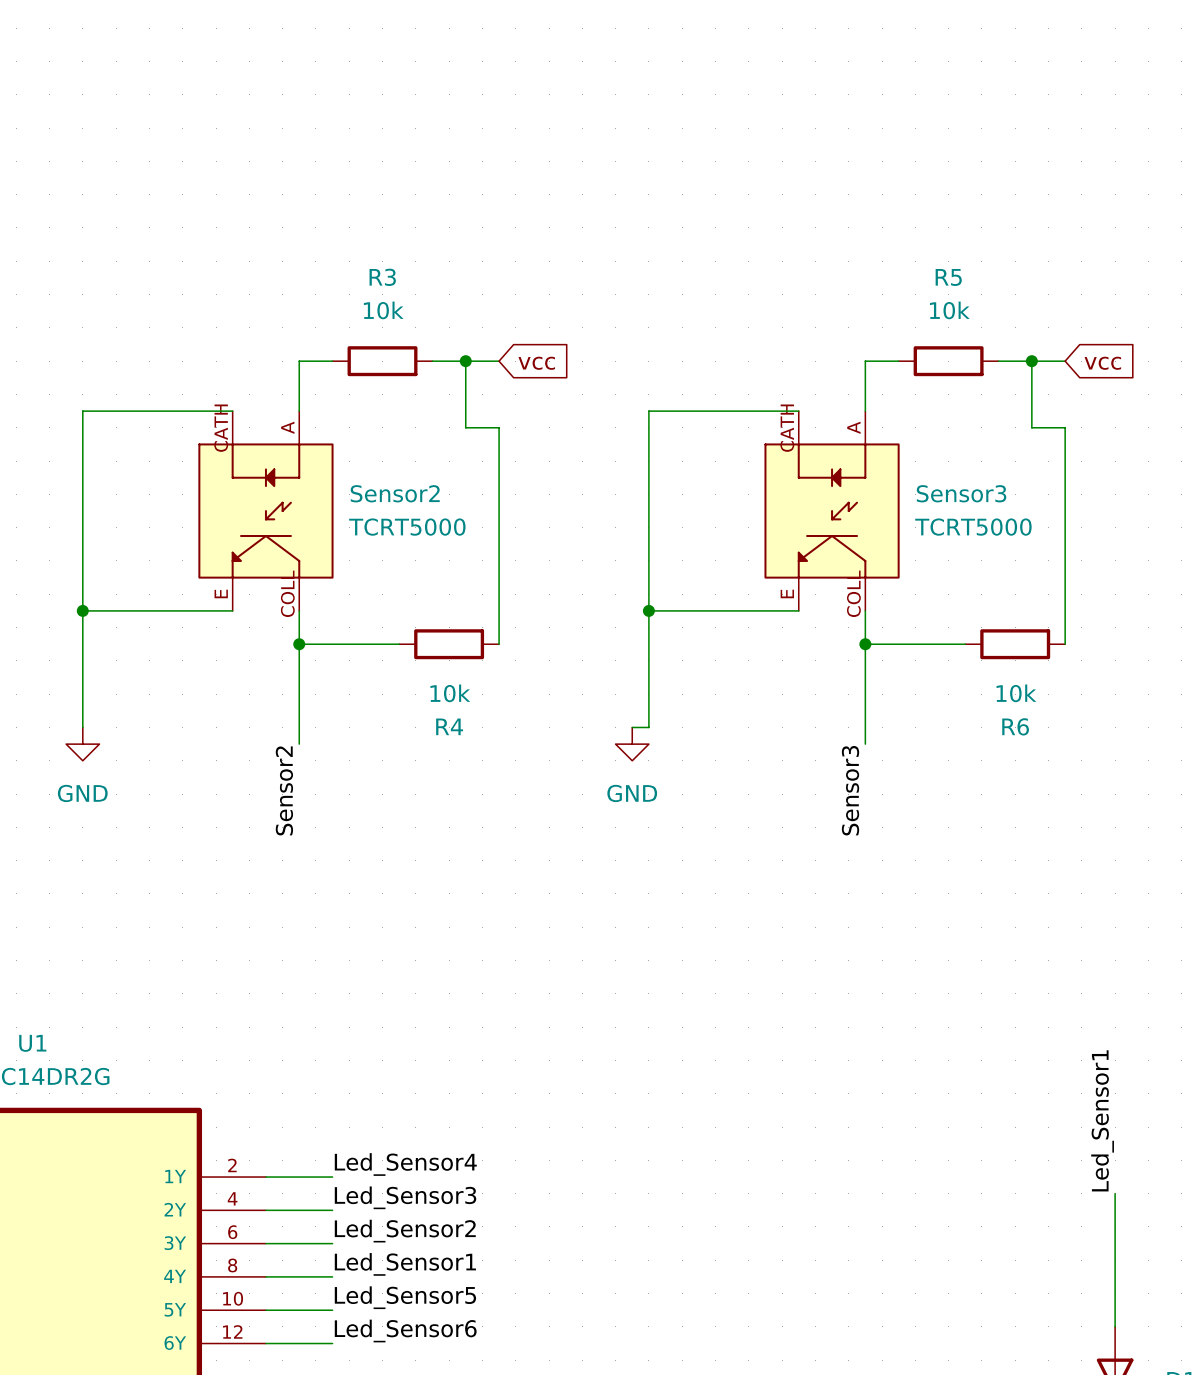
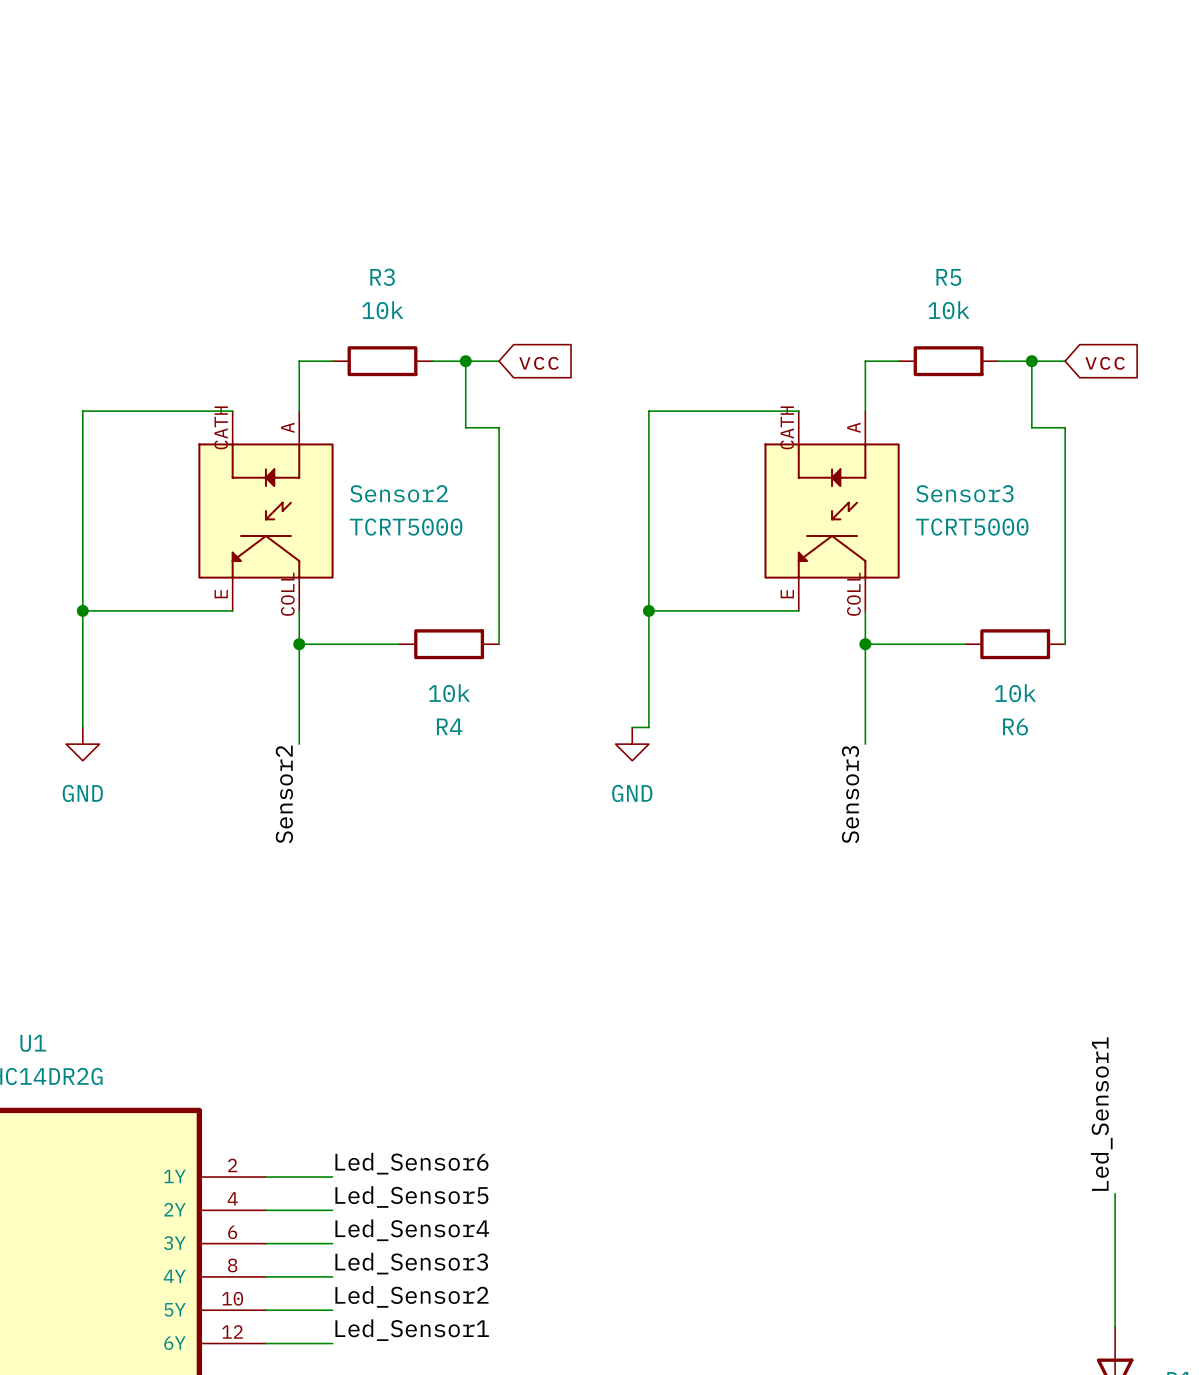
label: Led_Sensor4 (405, 1164) -> Led_Sensor6 (411, 1163)
label: Led_Sensor3 (405, 1197) -> Led_Sensor5 (411, 1196)
label: Led_Sensor2 (405, 1231) -> Led_Sensor4 (412, 1230)
label: Led_Sensor1 (405, 1264) -> Led_Sensor3 (411, 1263)
label: Led_Sensor5 (405, 1297) -> Led_Sensor2 (411, 1296)
label: Led_Sensor6 (405, 1331) -> Led_Sensor1 (412, 1330)

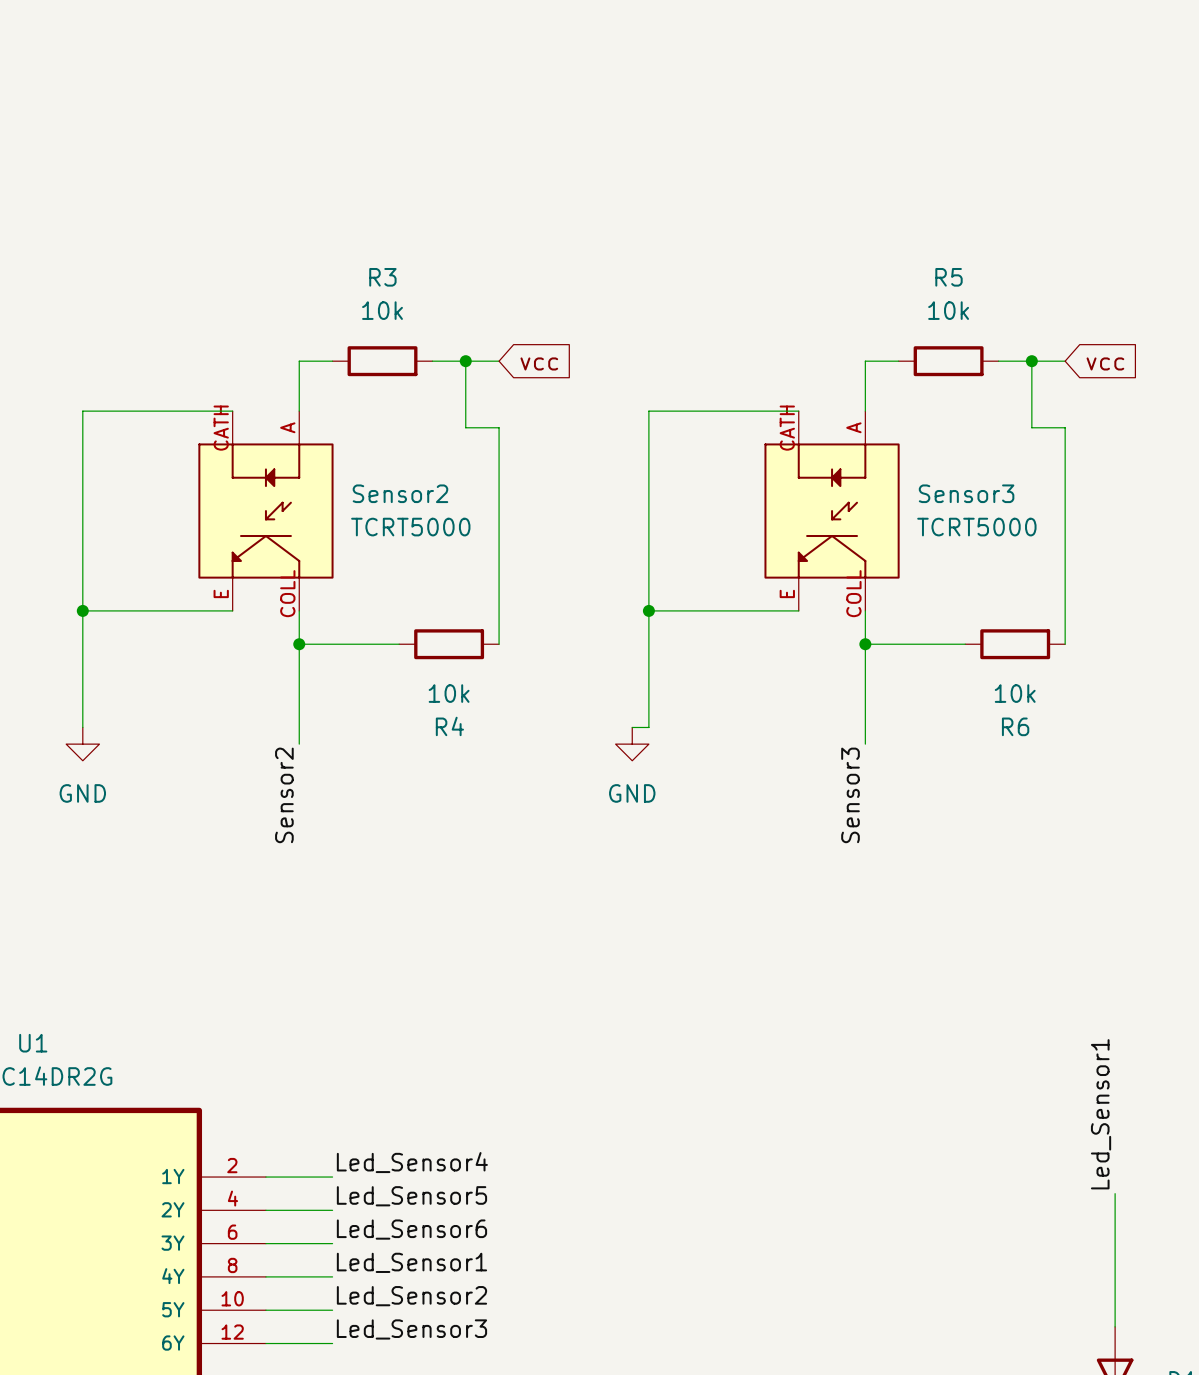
label: Led_Sensor6 (411, 1163) -> Led_Sensor4 (412, 1162)
label: Led_Sensor4 (412, 1230) -> Led_Sensor6 (411, 1229)
label: Led_Sensor3 (411, 1263) -> Led_Sensor1 (411, 1262)
label: Led_Sensor1 (412, 1330) -> Led_Sensor3 (411, 1329)

